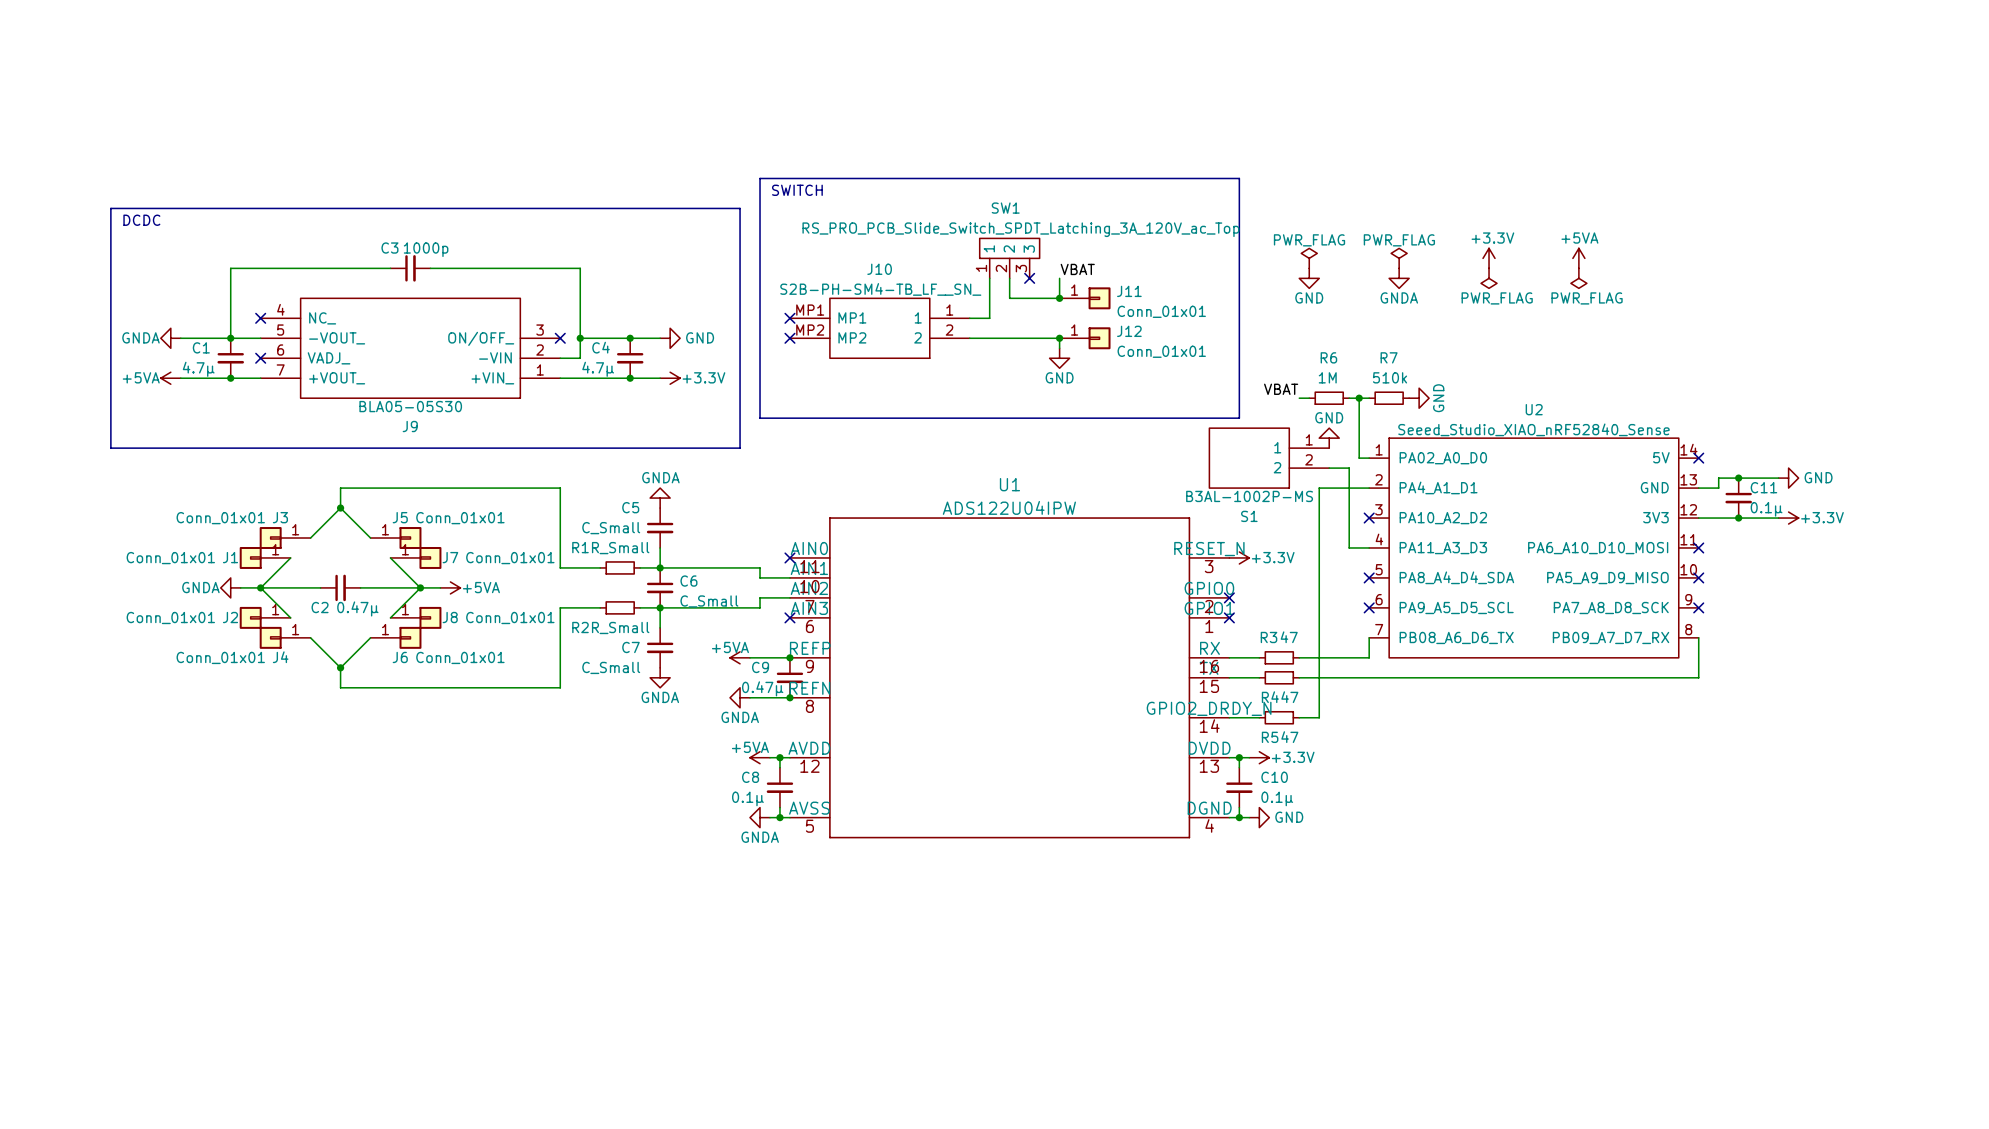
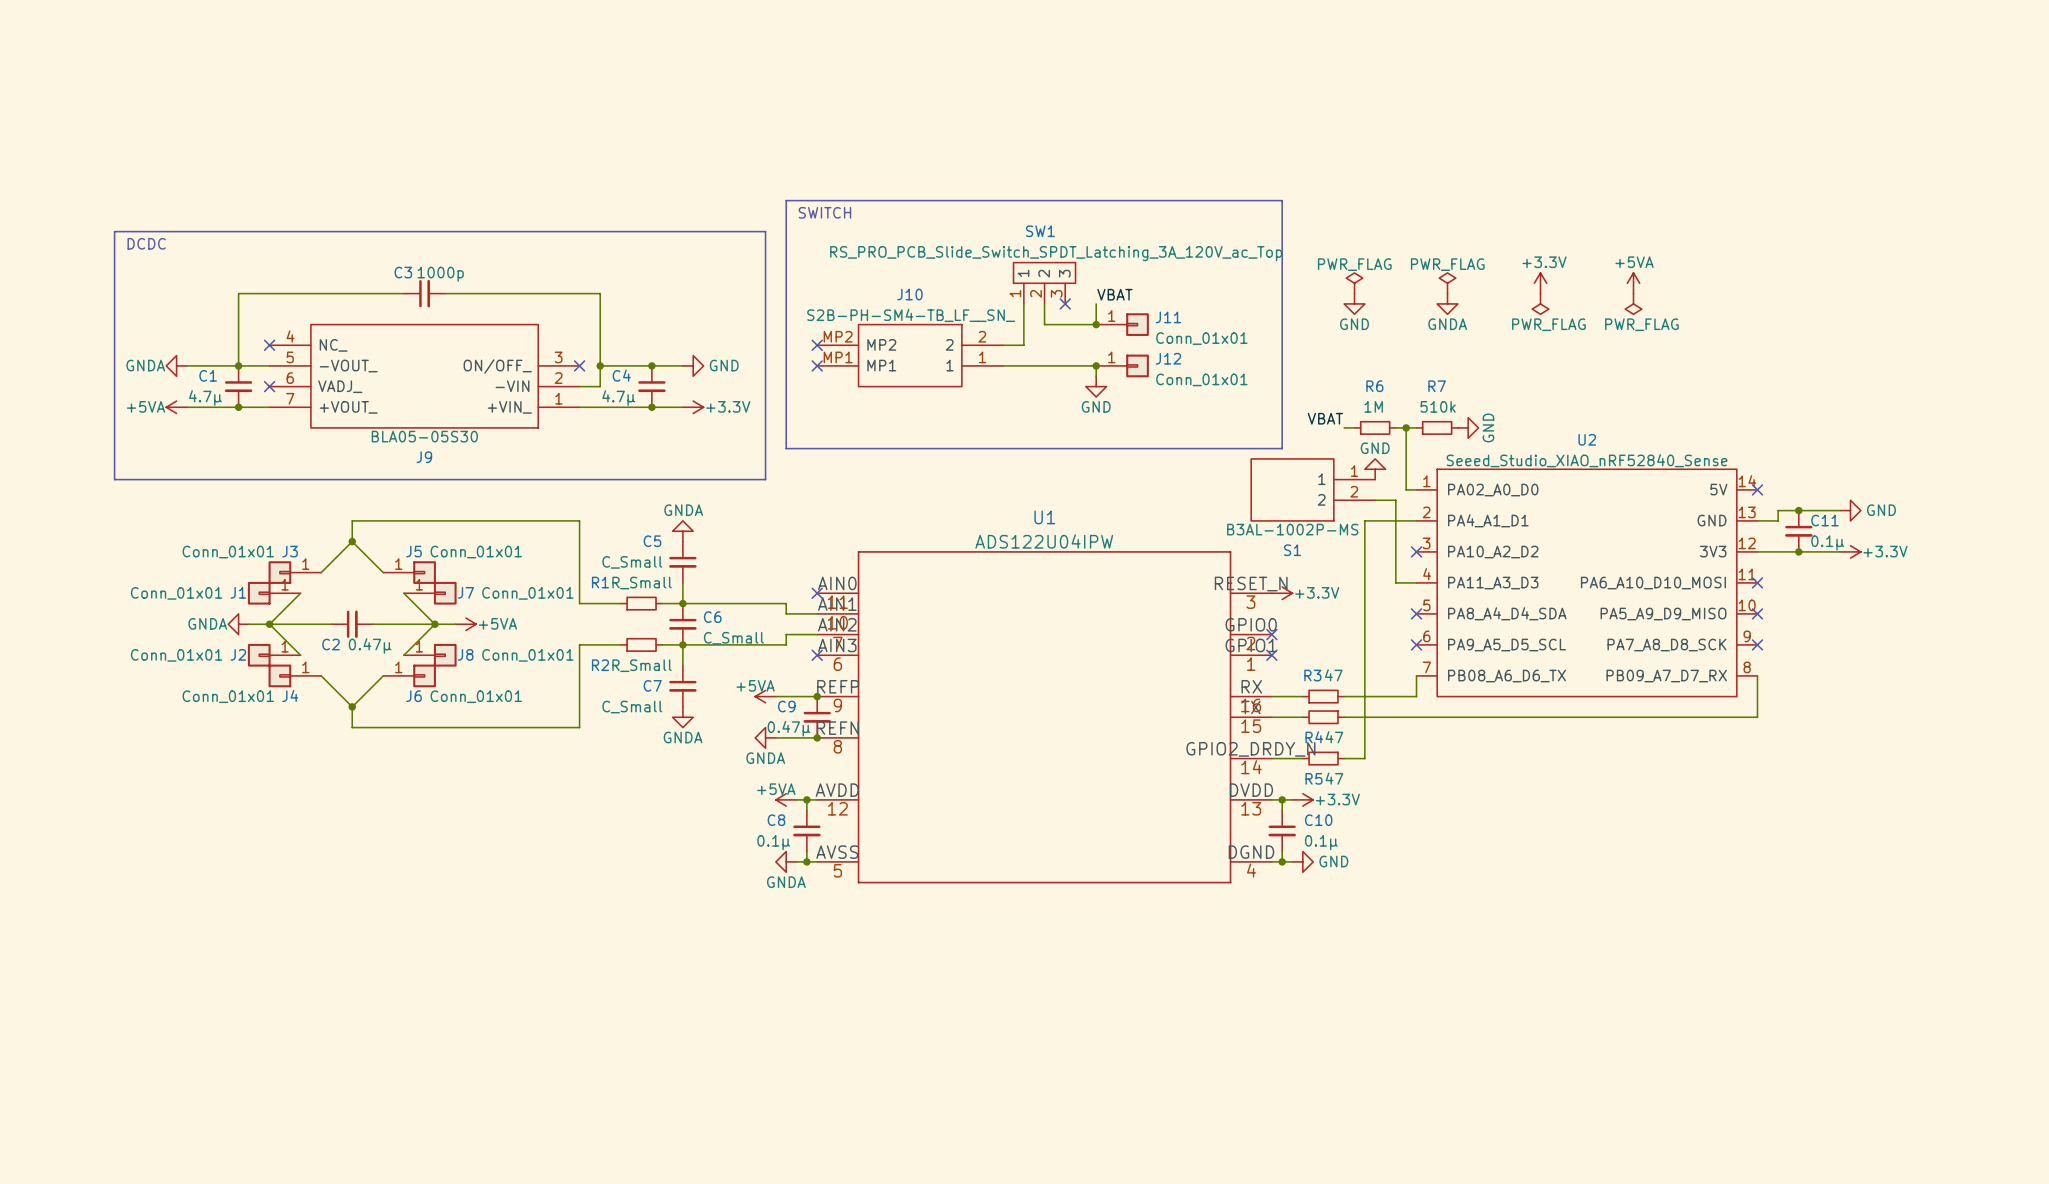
J10 flip: as is (879, 328) -> up-down (910, 355)

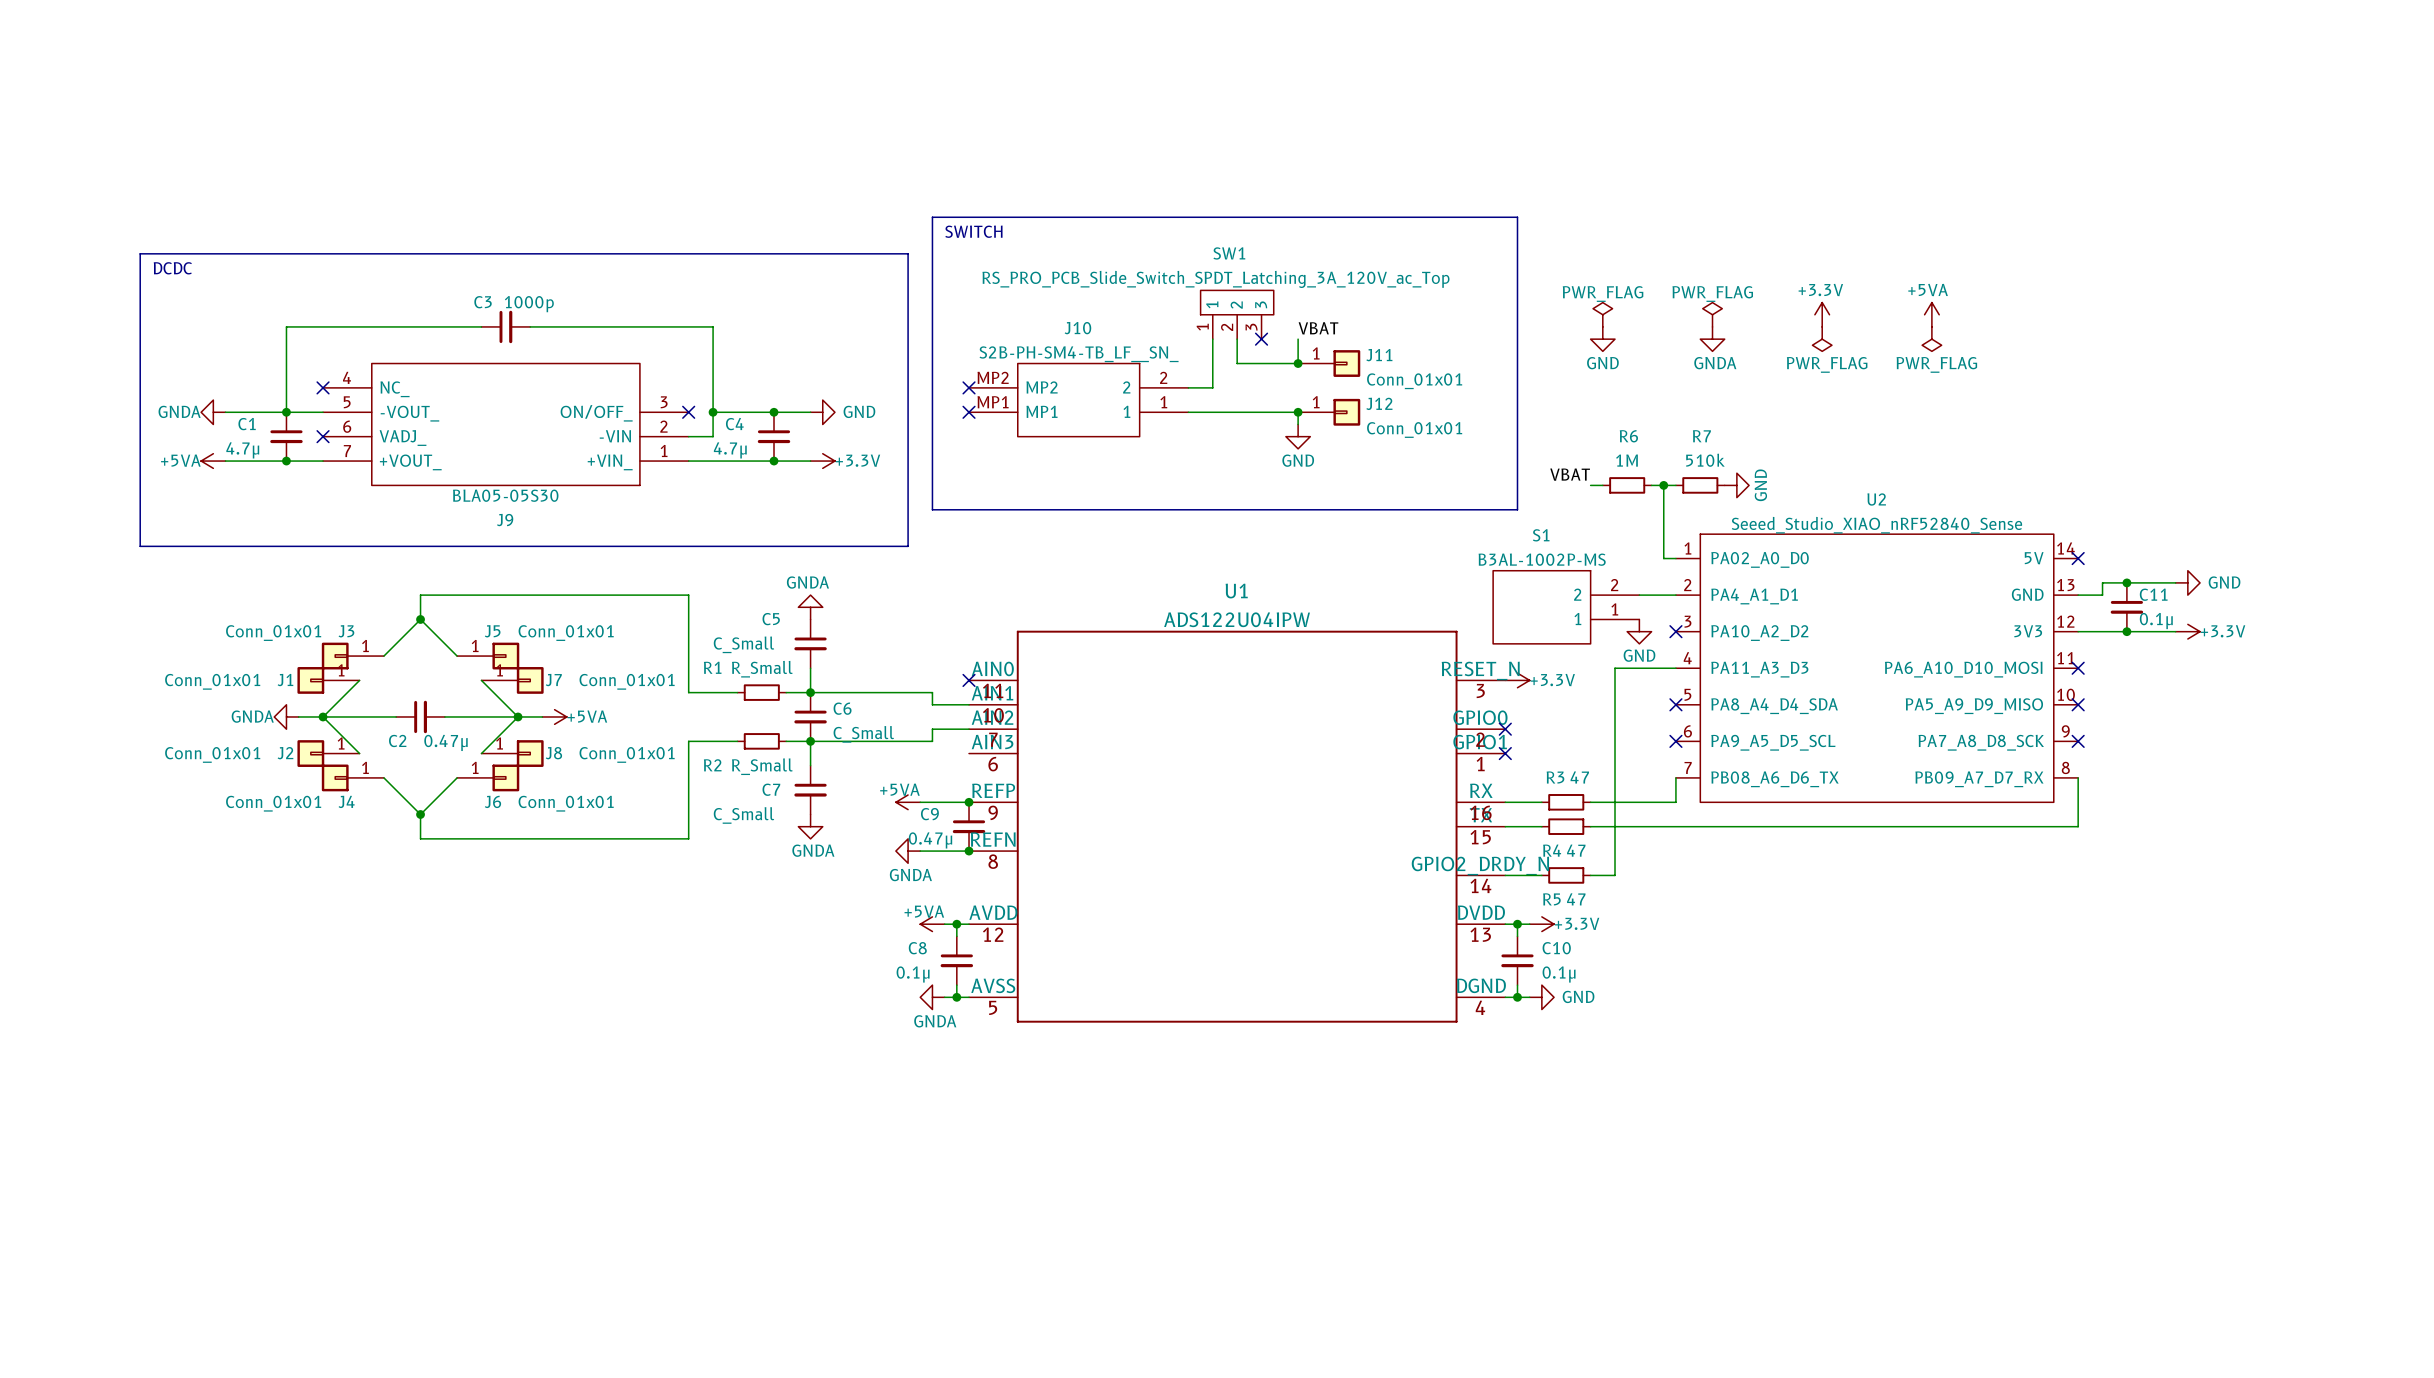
power symbol rotation: 0° (1375, 469) -> 180° (1639, 631)
power symbol position: GND (1375, 469) -> GND (1639, 631)
S1 flip: as is (1292, 489) -> up-down (1541, 607)
wire: (1375, 500) (1395, 500) (1395, 582) -> none
wire: (1385, 520) (1364, 520) (1364, 582) -> (1651, 668) (1615, 668)
no-connect mark: (817, 655) -> none

